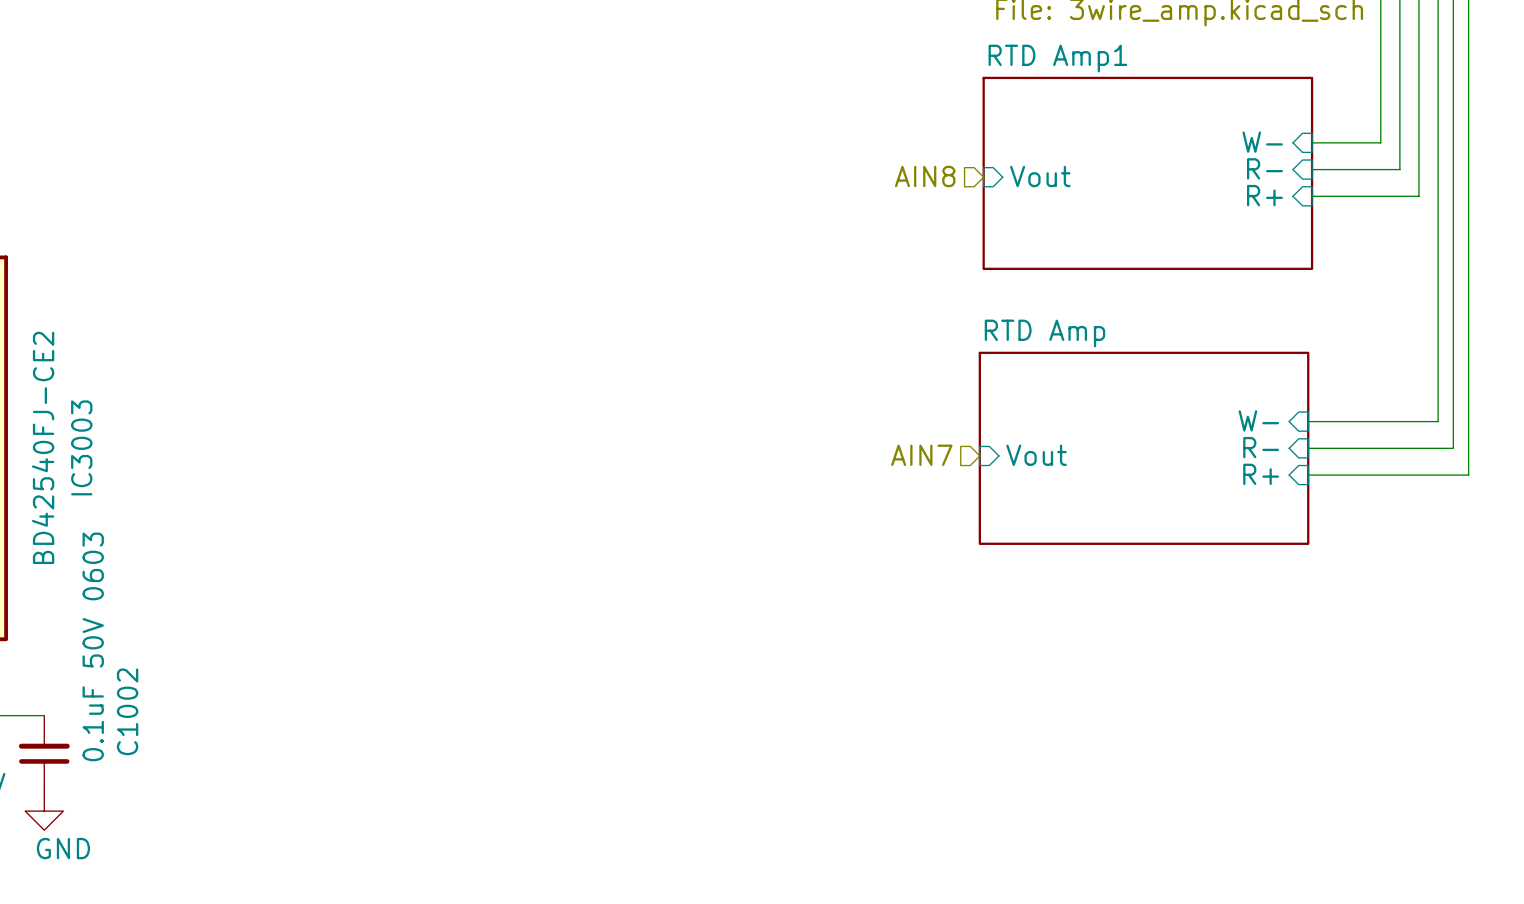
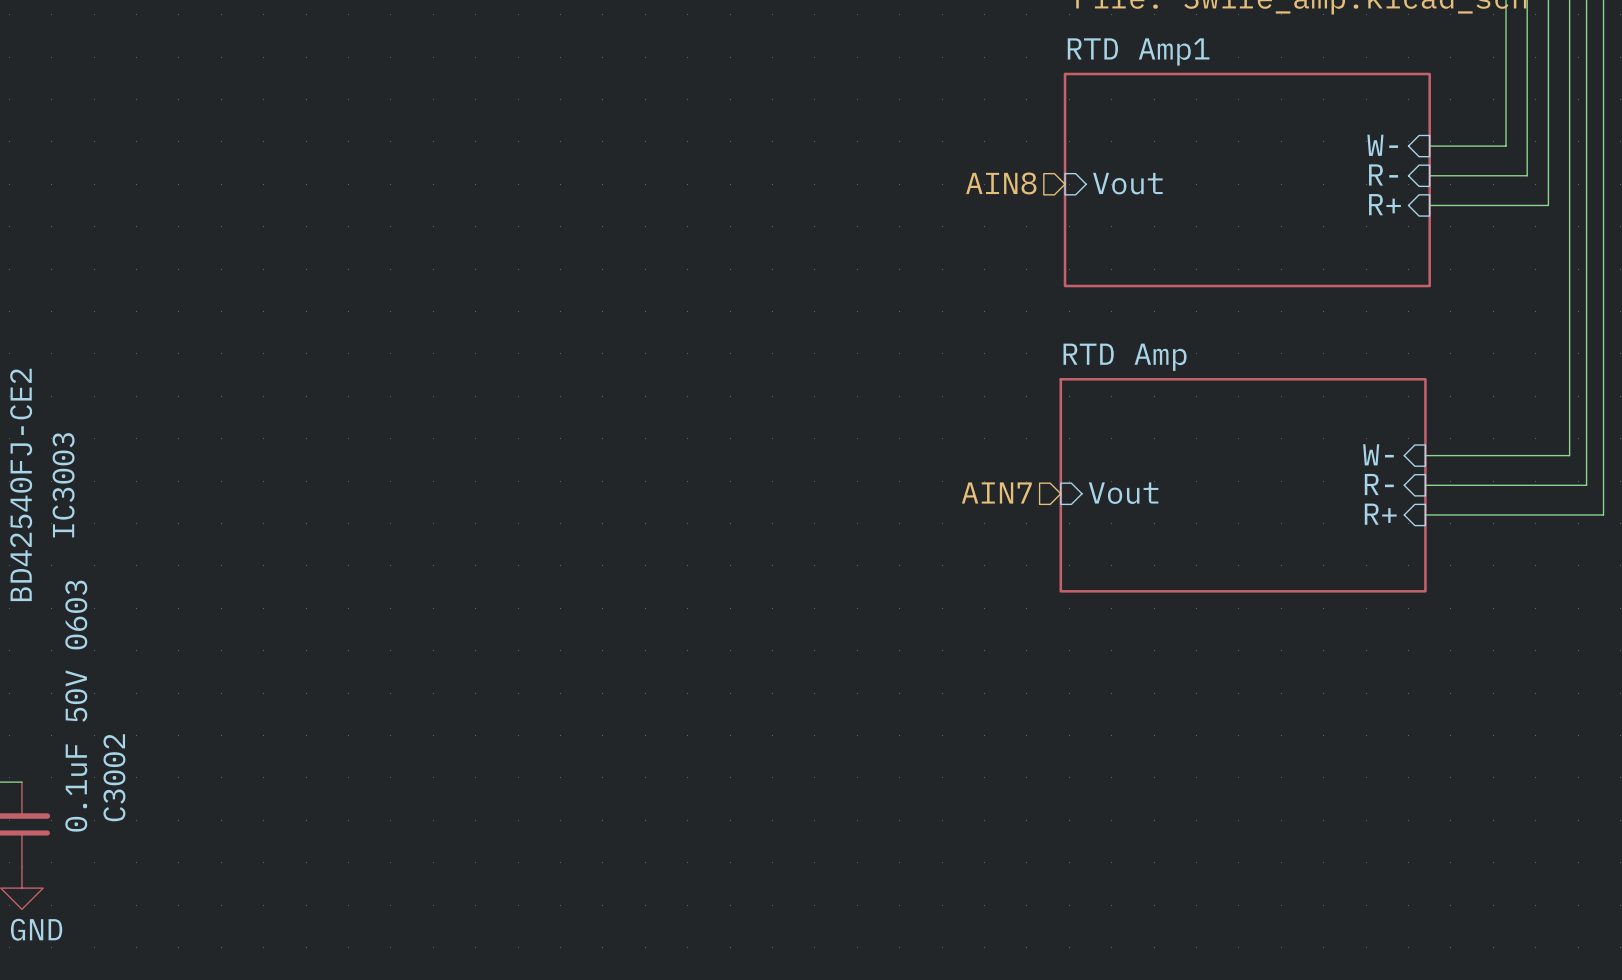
C1002 name: C1002 (127, 711) -> C3002 (114, 777)

